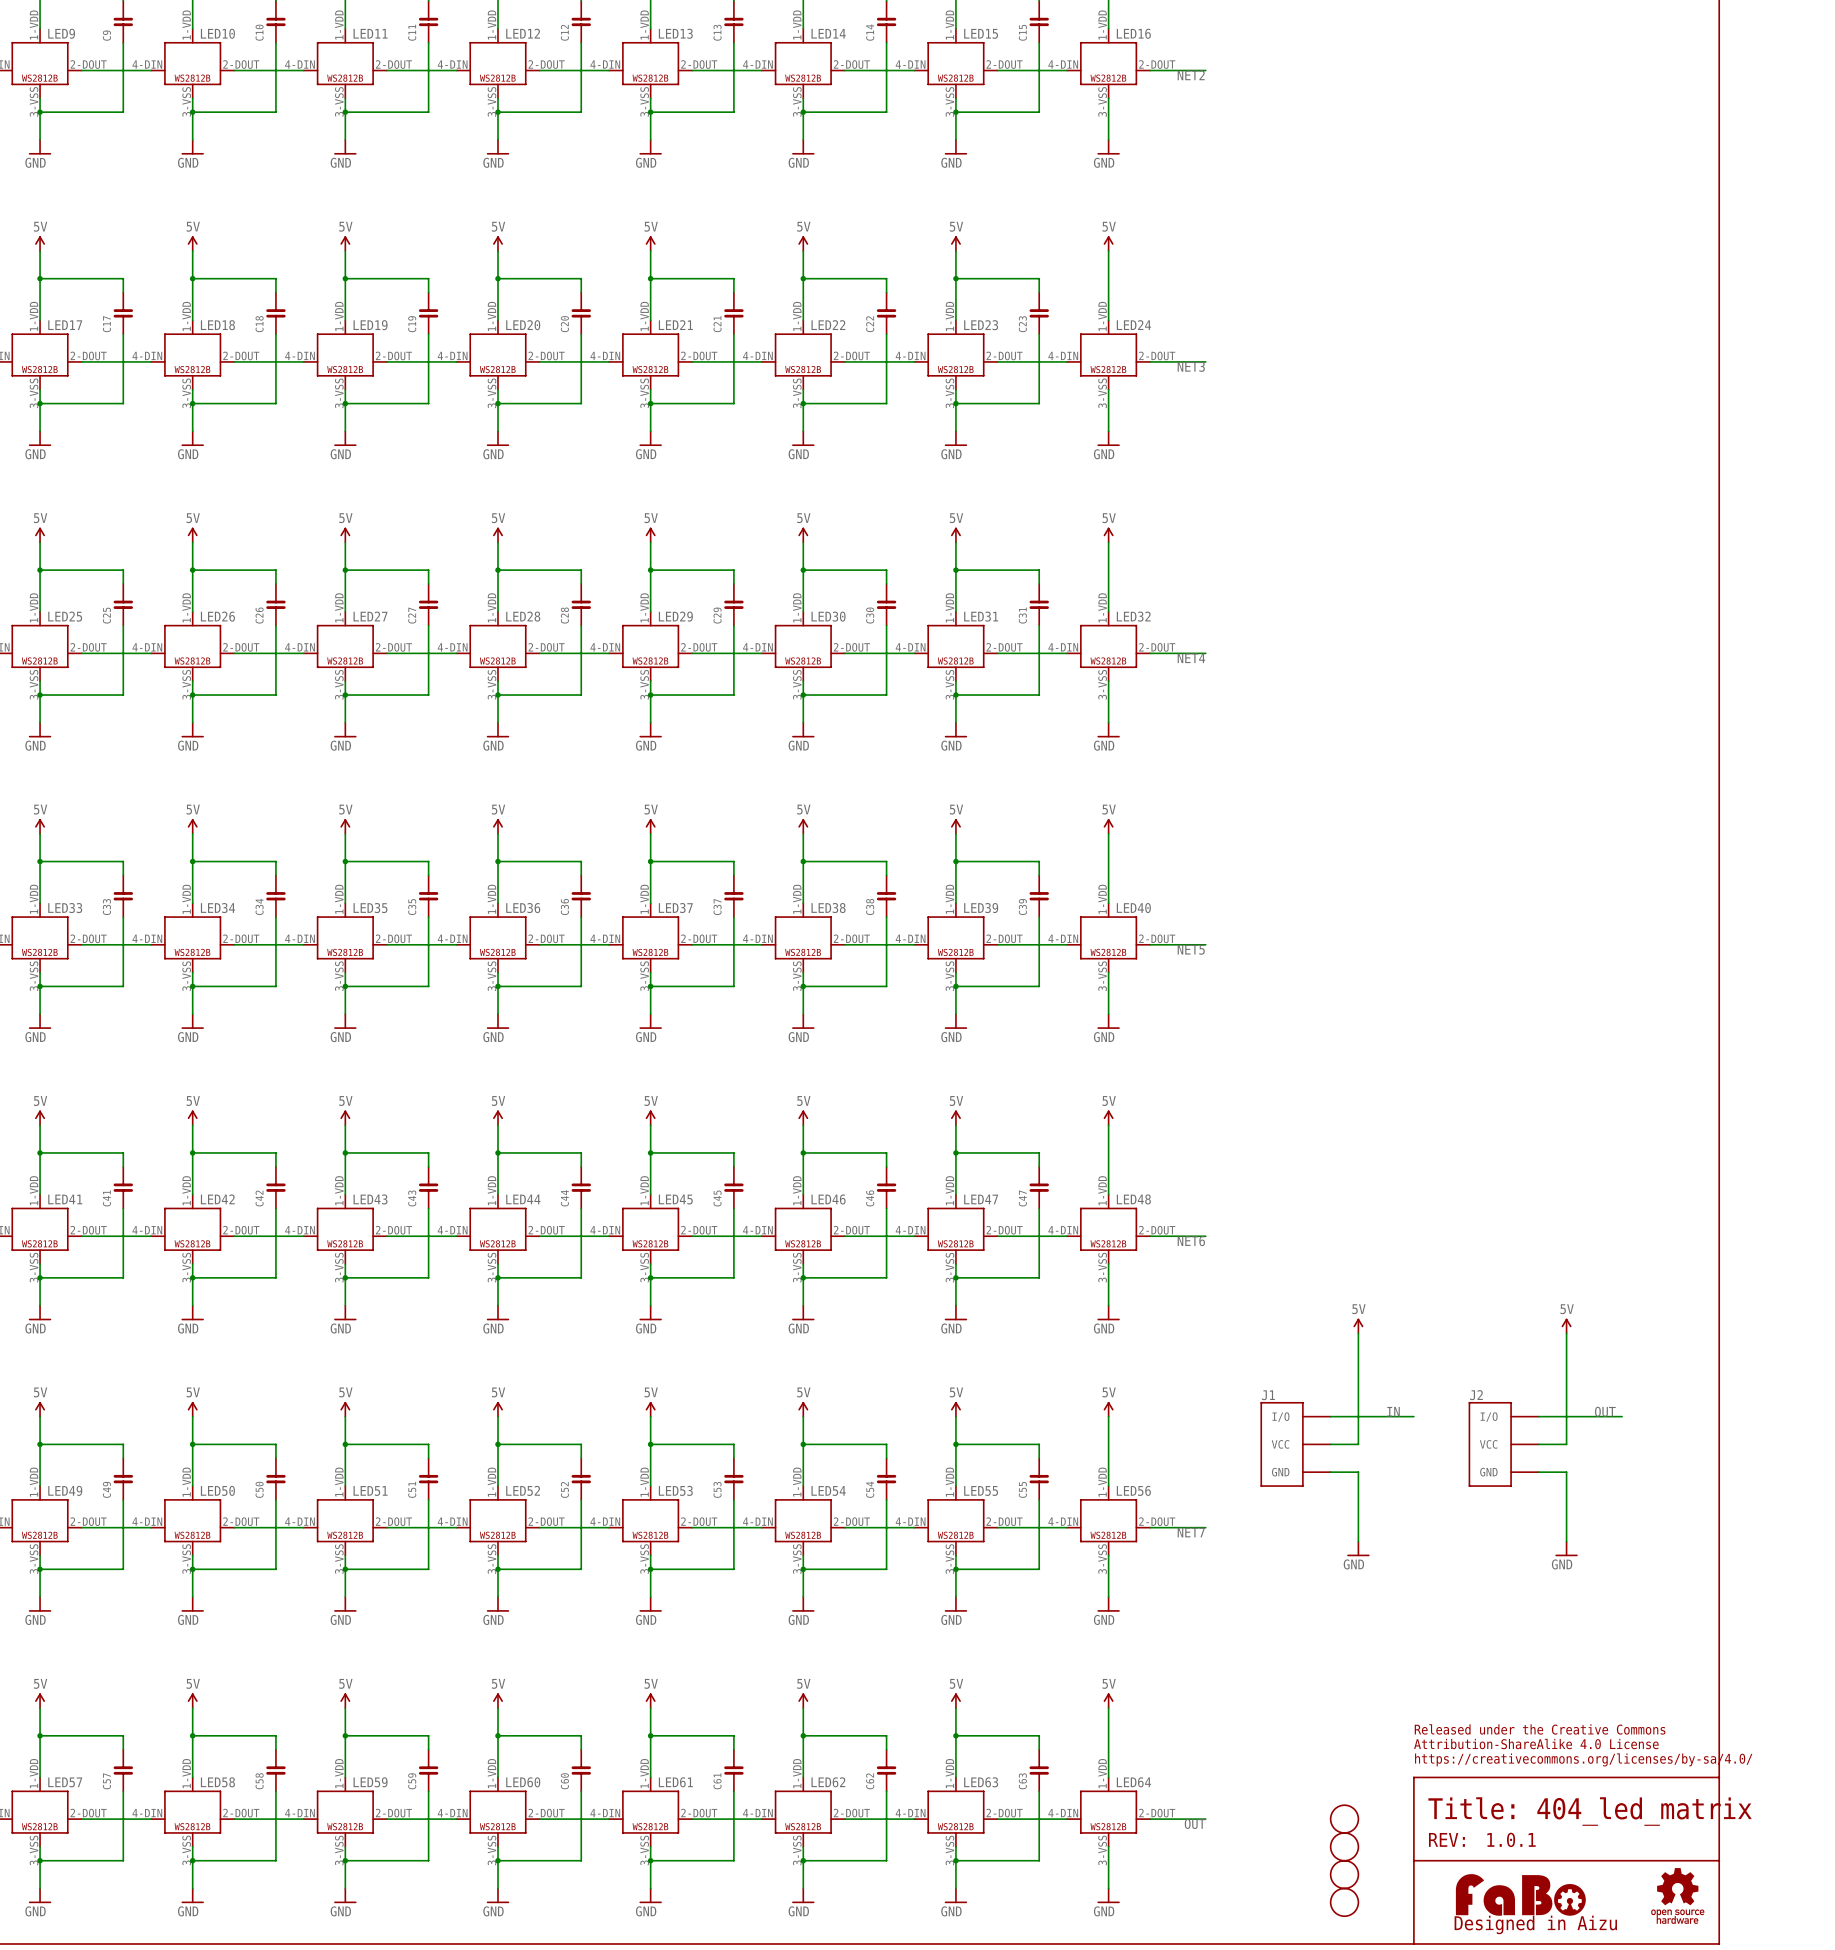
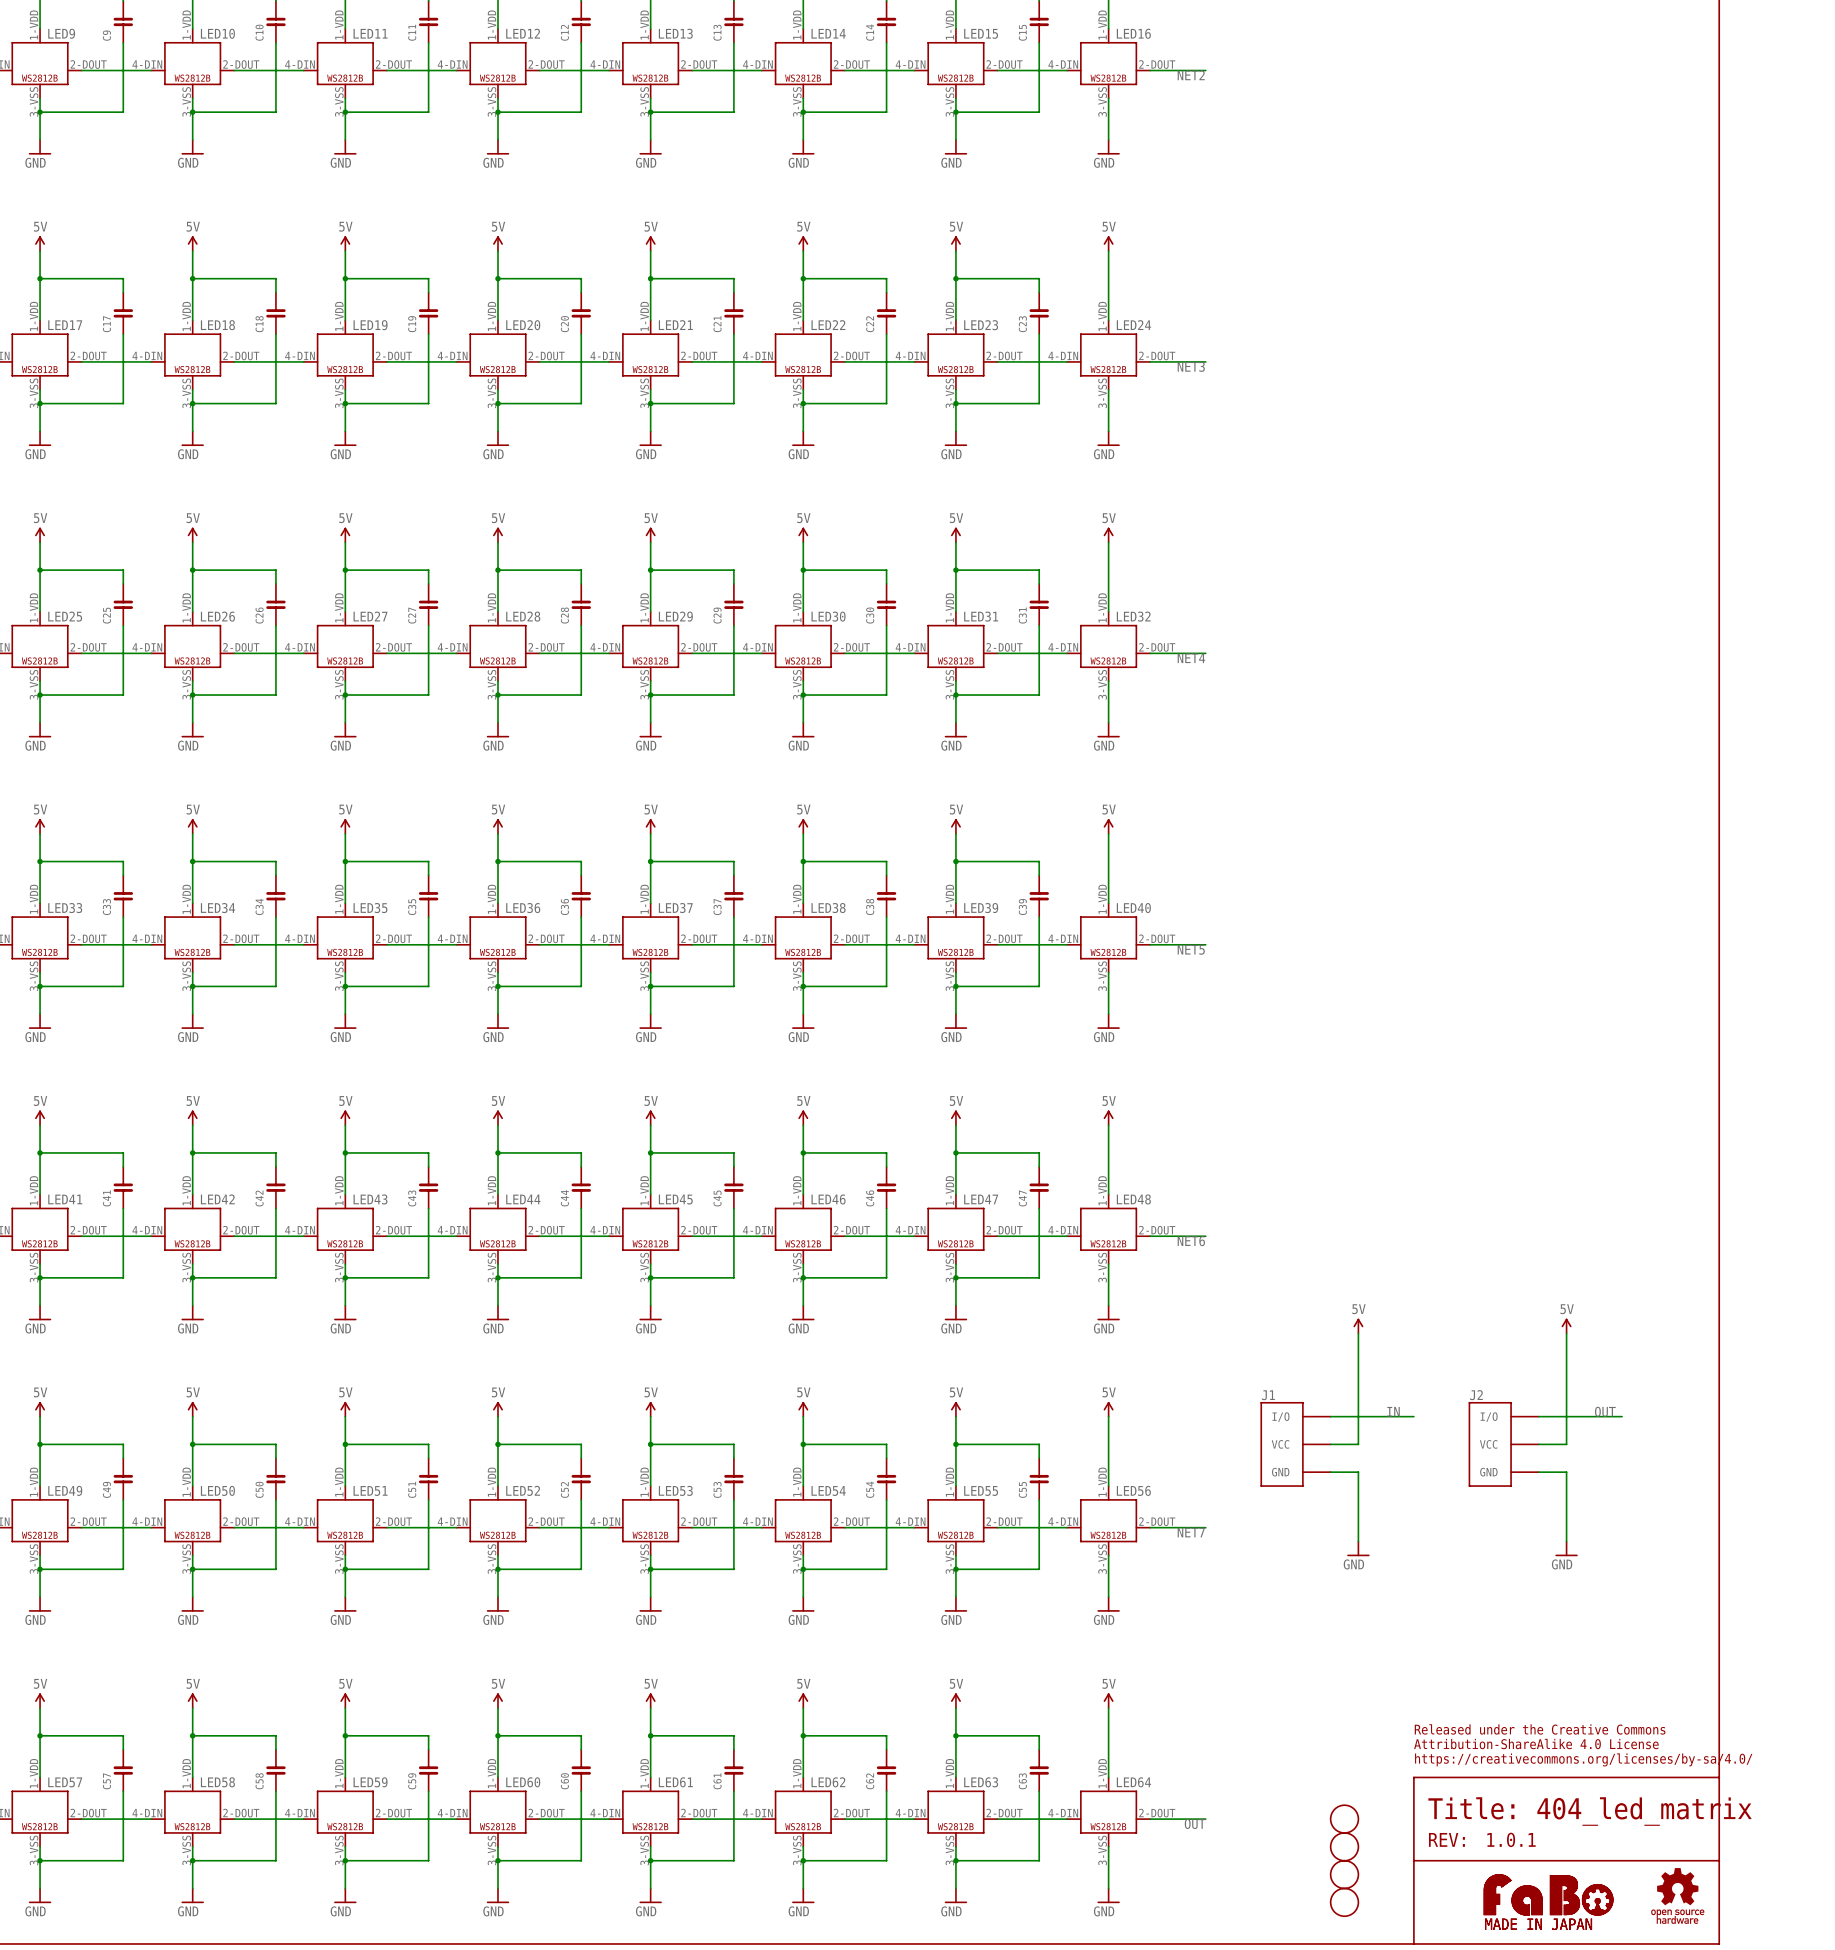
part: (1520, 1894) -> none
part: none -> (1548, 1894)

